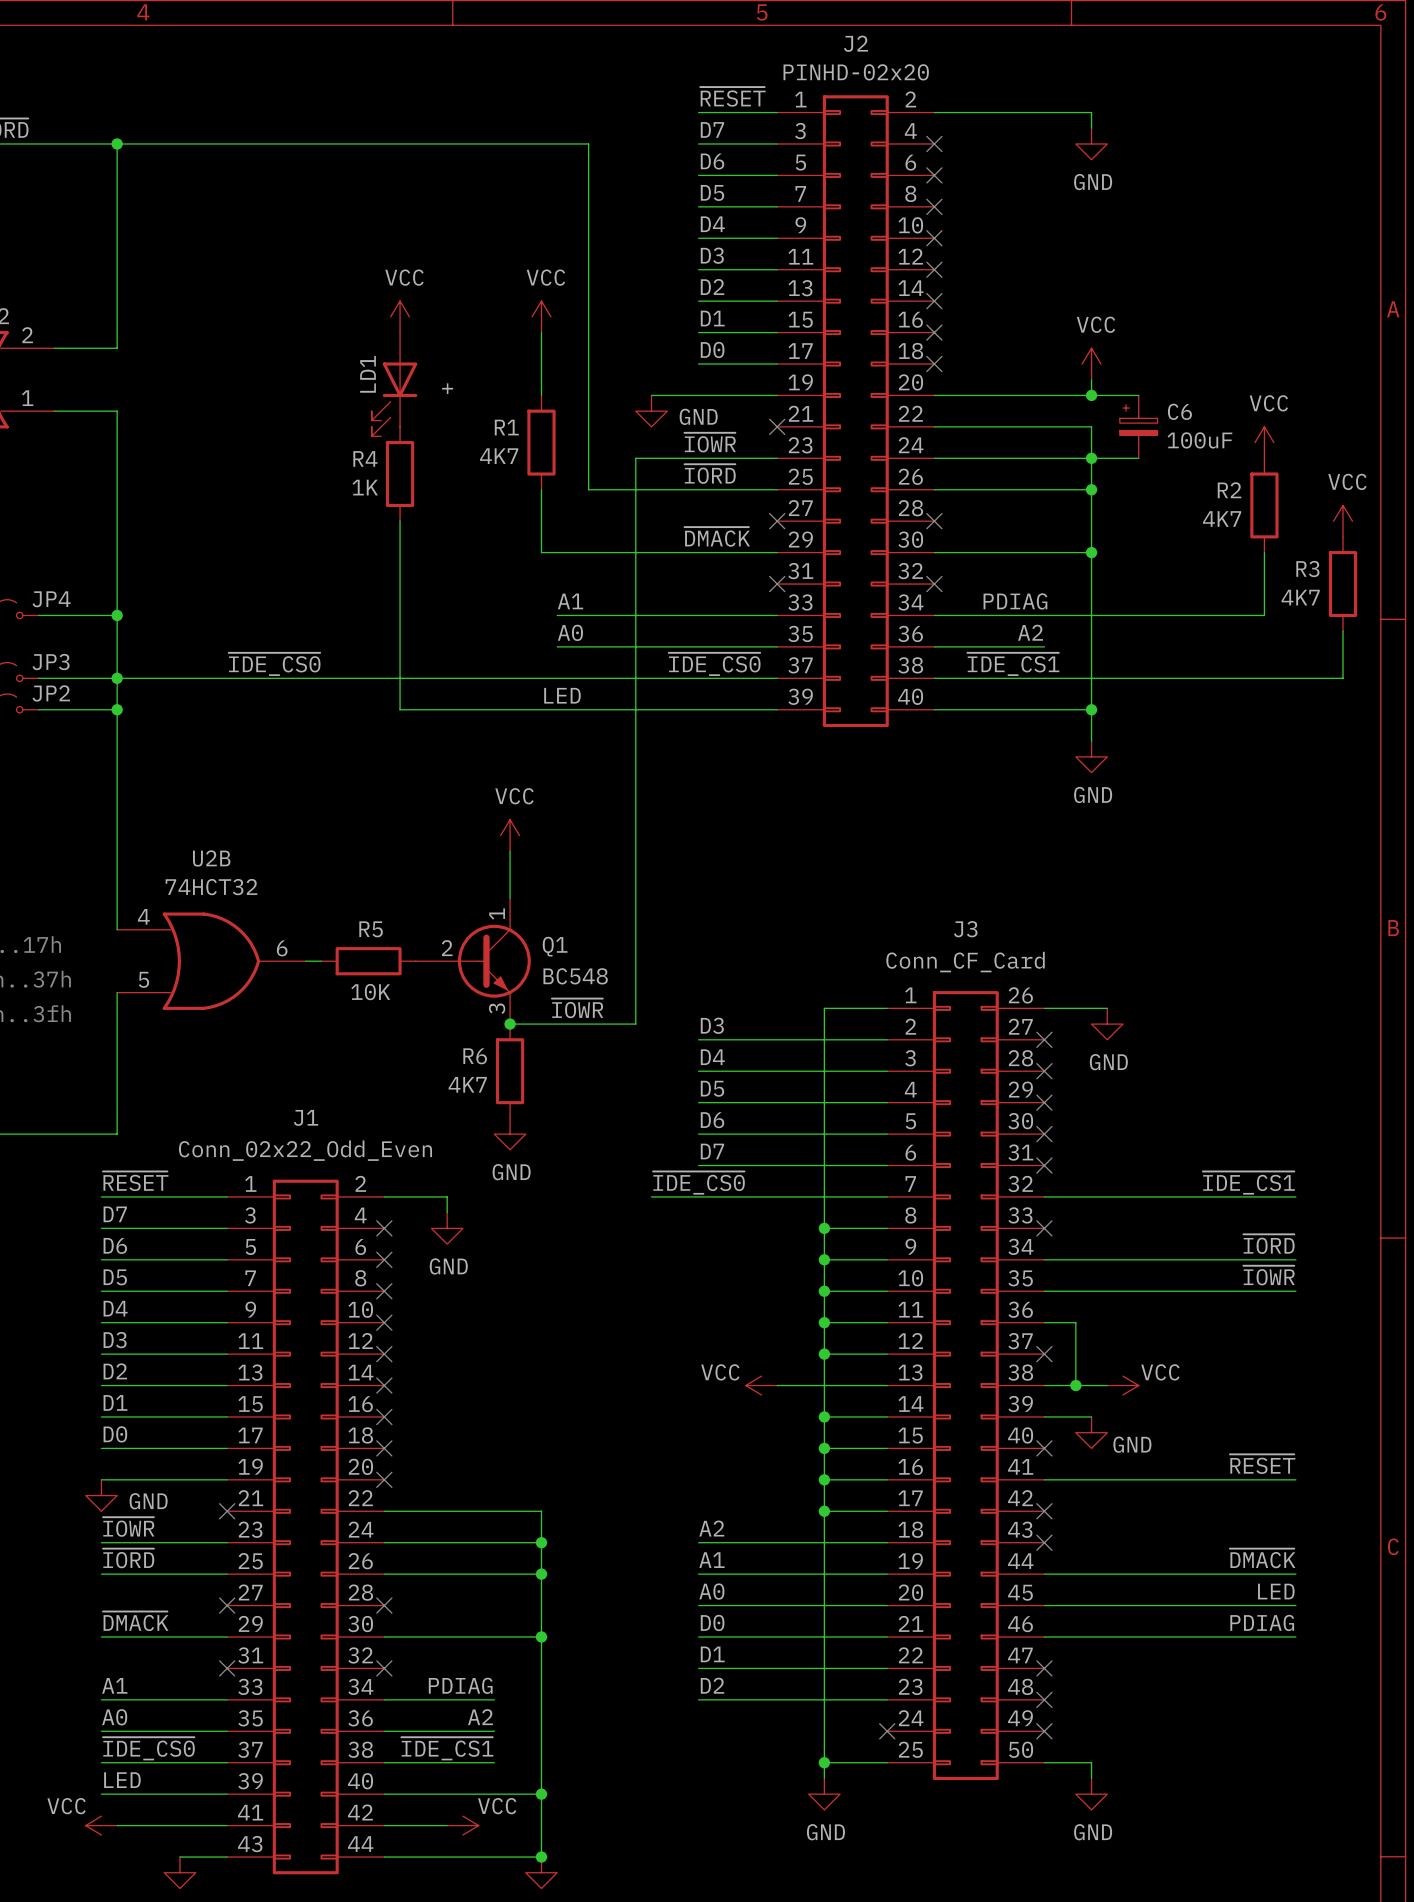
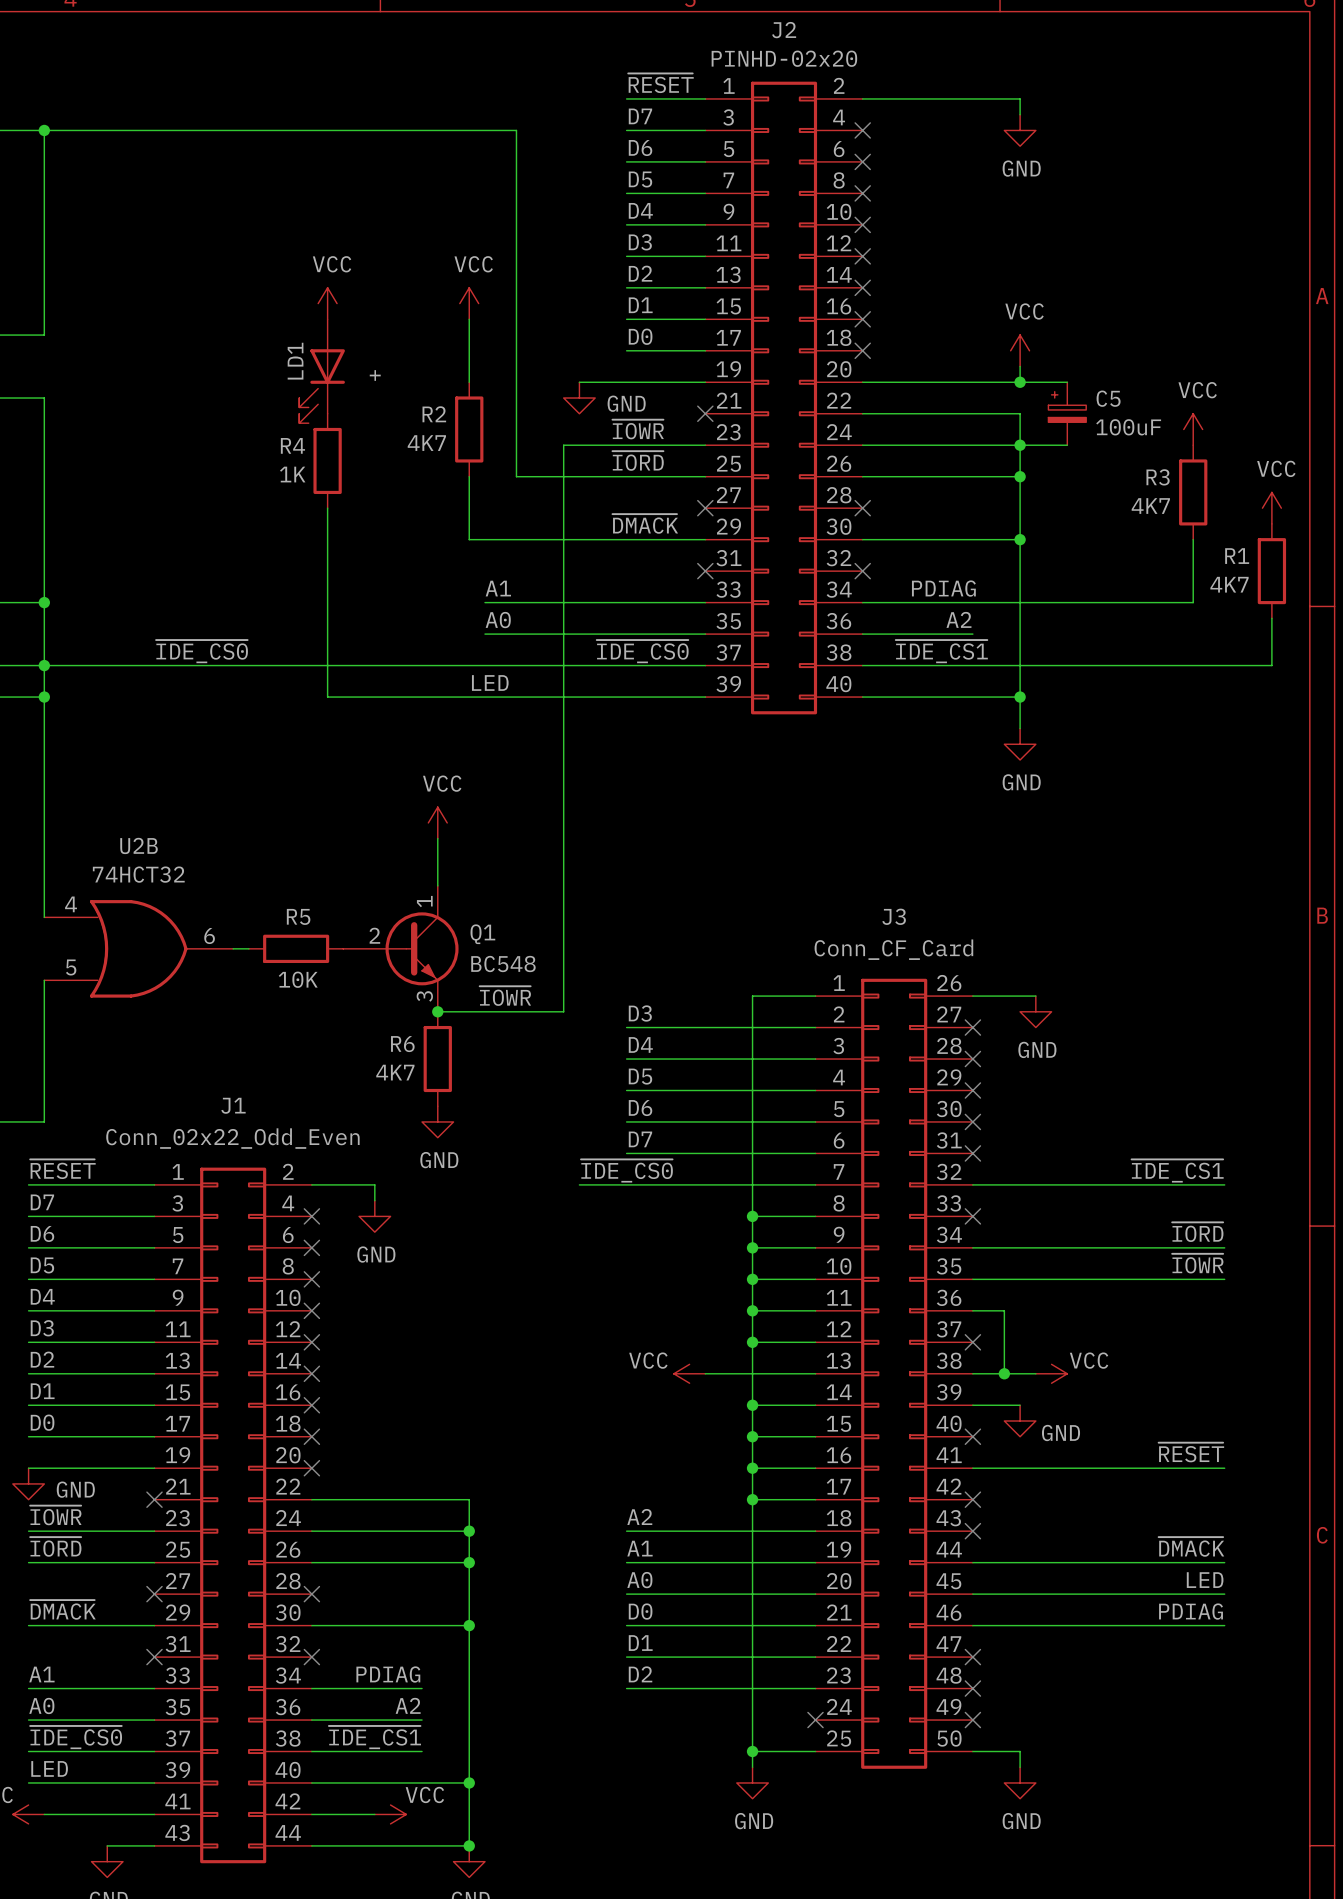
C6 name: C6 (1179, 411) -> C5 (1108, 398)
R1 name: R1 (506, 427) -> R2 (434, 414)
R2 name: R2 (1229, 490) -> R3 (1158, 477)
R3 name: R3 (1307, 568) -> R1 (1237, 556)

